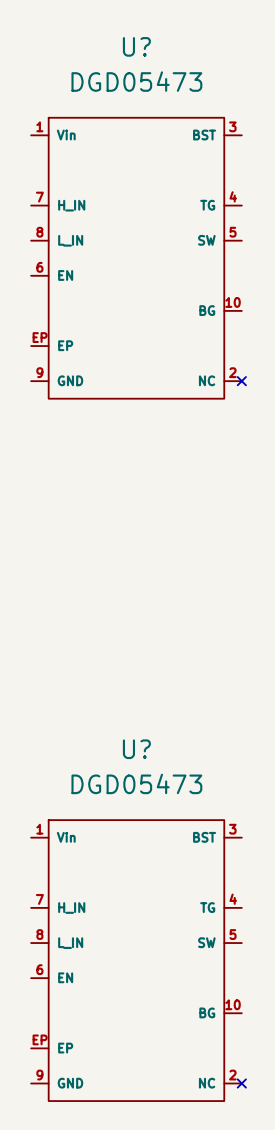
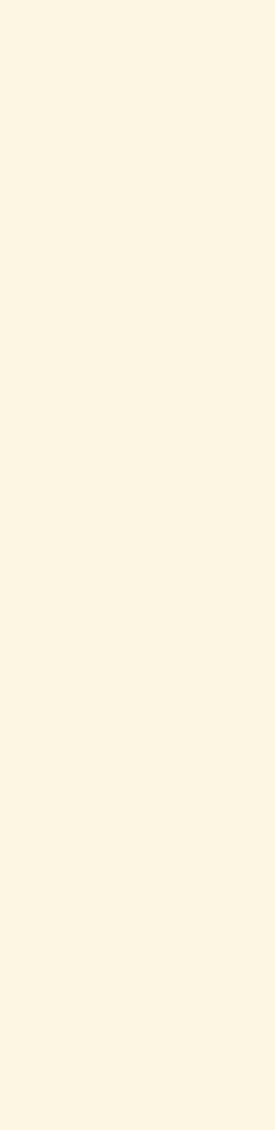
U?: DGD05473 (138, 258) -> none
U?: DGD05473 (138, 960) -> none

